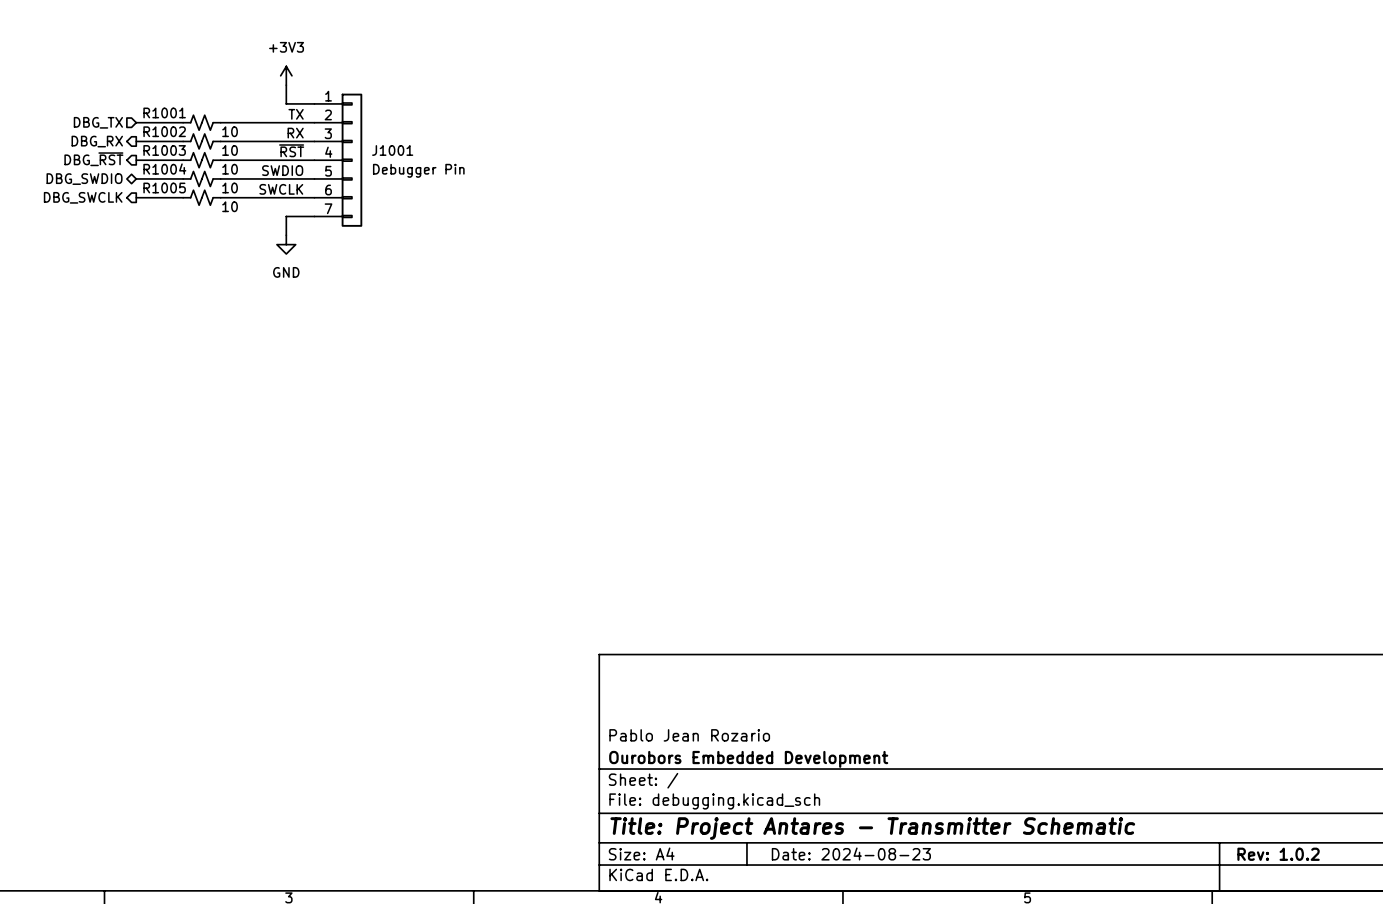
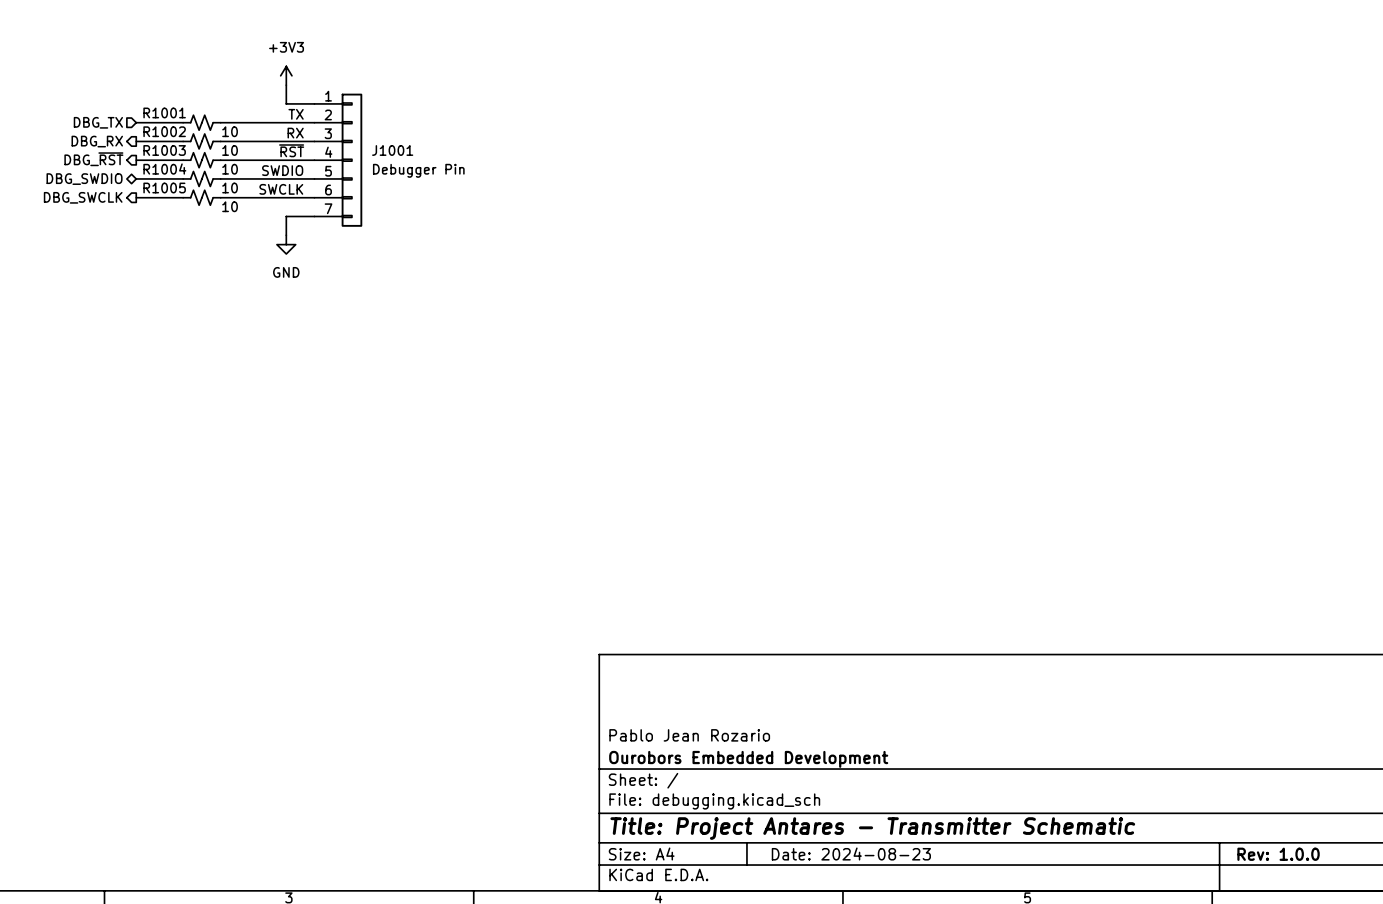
title block: Rev: 1.0.2 (1278, 854) -> Rev: 1.0.0 (1278, 854)

